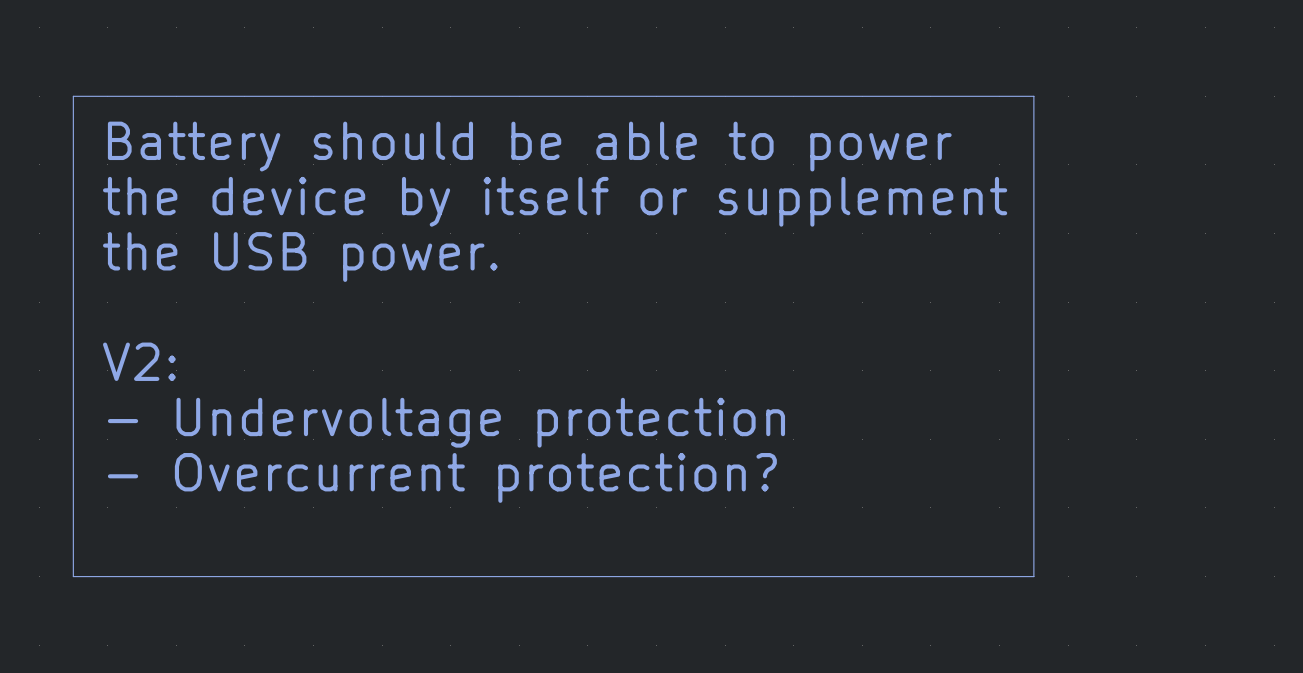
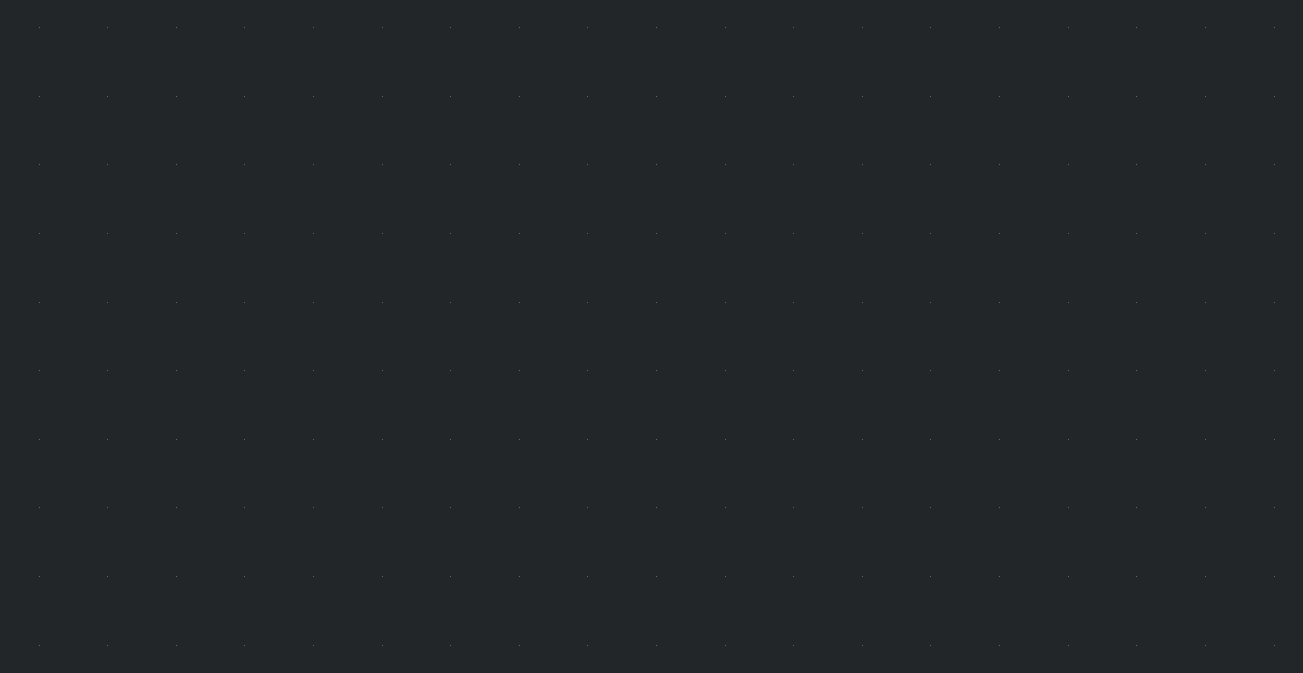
line: (73, 96) (1033, 96) (1033, 576) (73, 576) (73, 96) -> none
text: Battery should be able to power (529, 146) -> none
text: the device by itself or supplement (555, 201) -> none
text: the USB power. (300, 257) -> none
text: V2: (139, 361) -> none
text: - Undervoltage protection (446, 422) -> none
text: - Overcurrent protection? (442, 477) -> none

